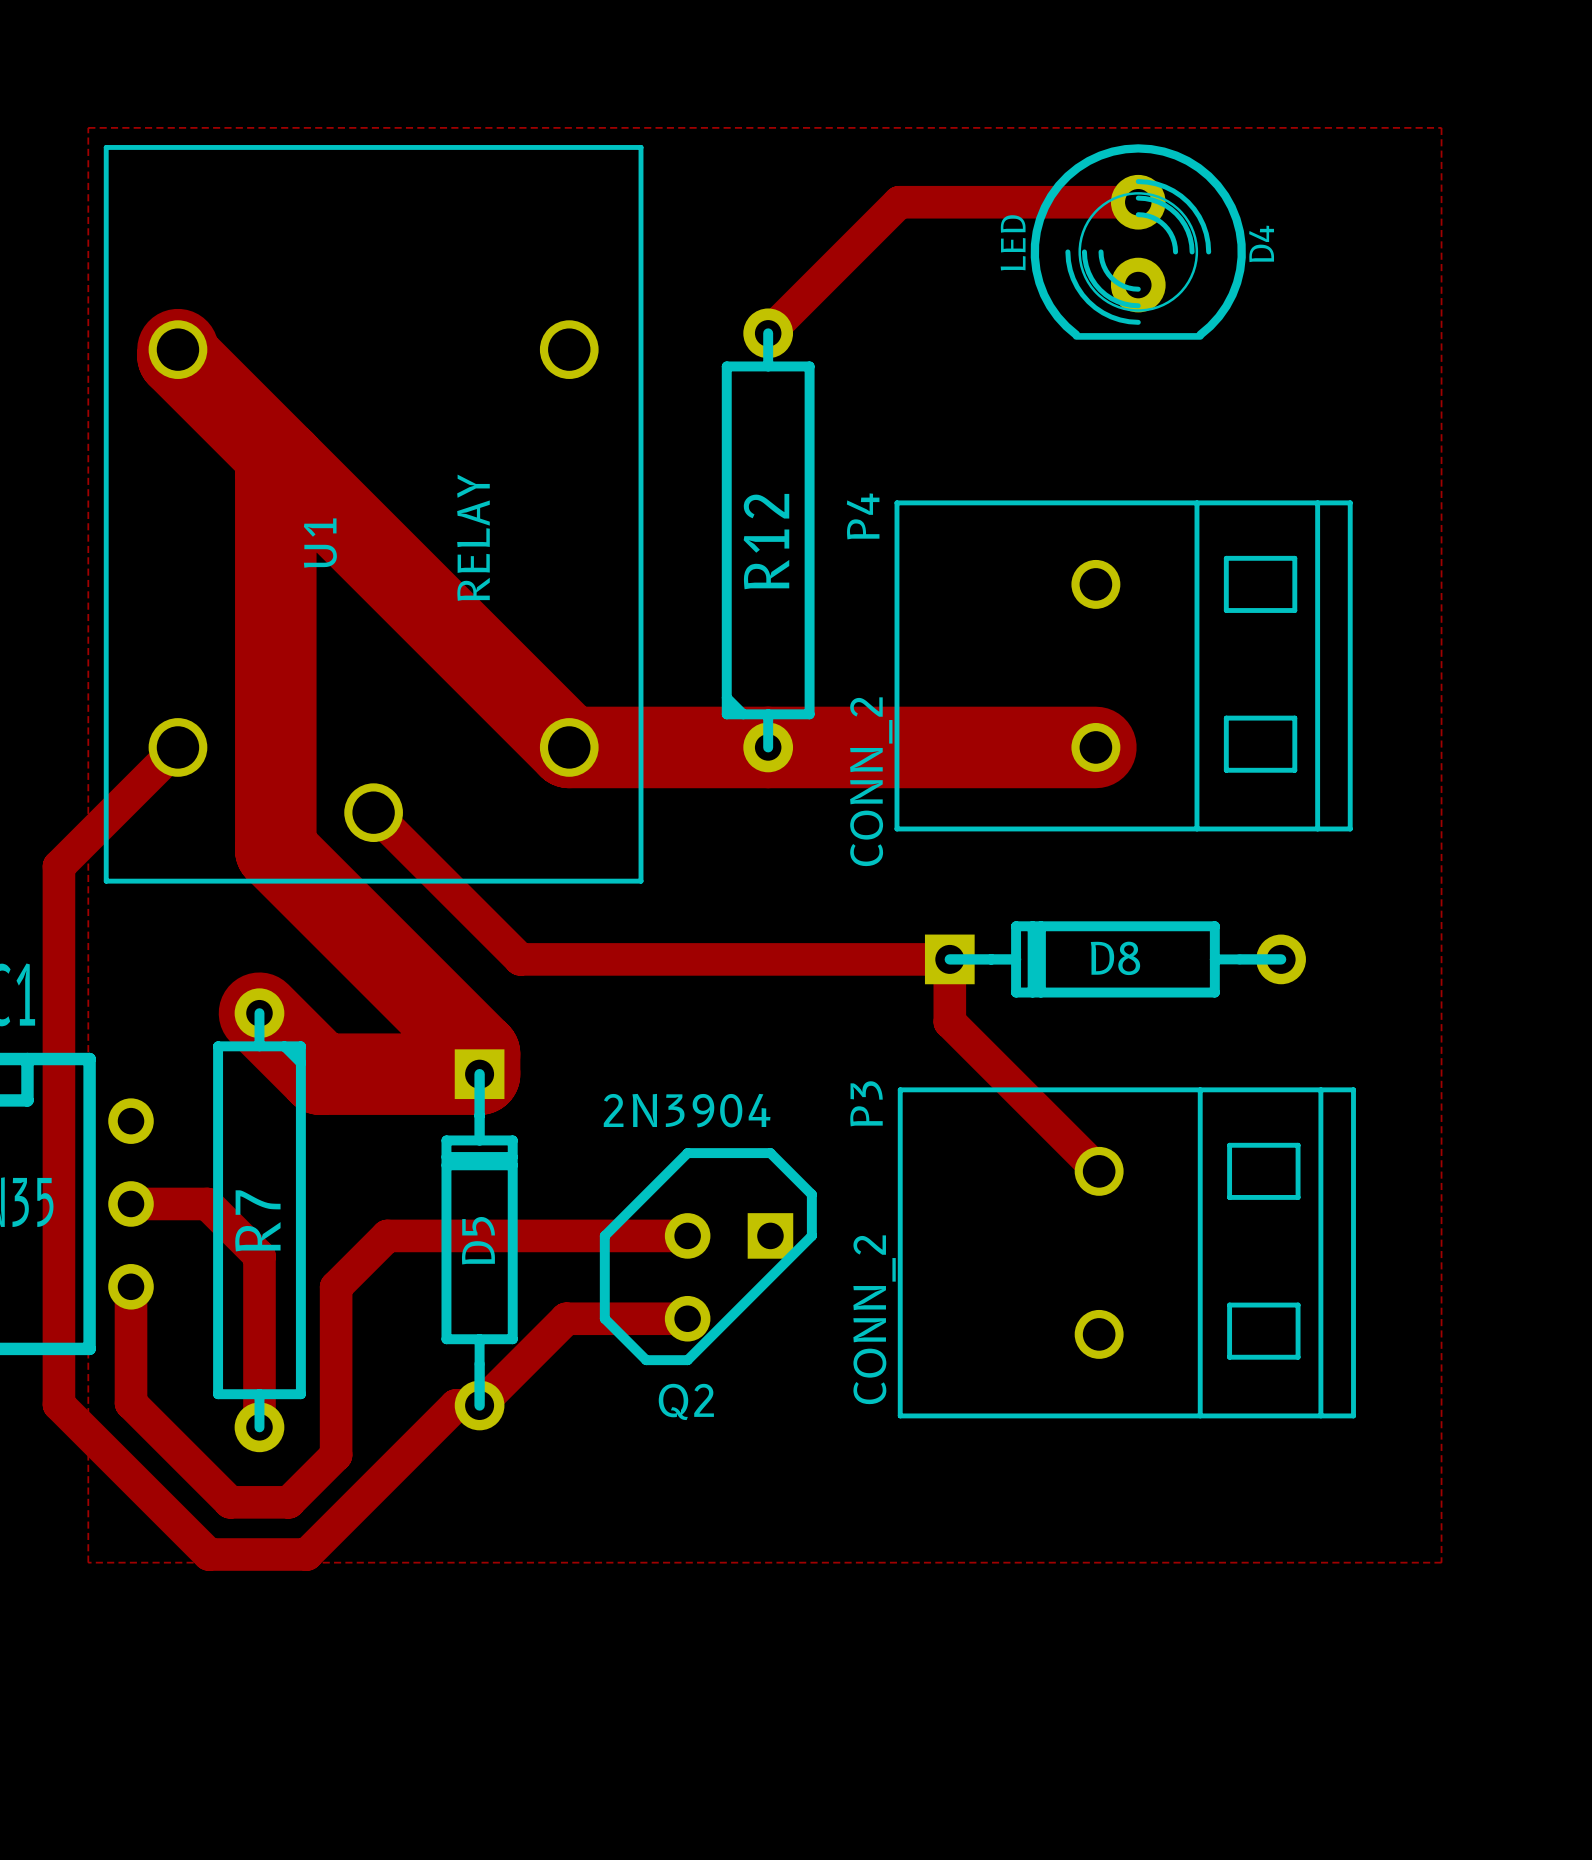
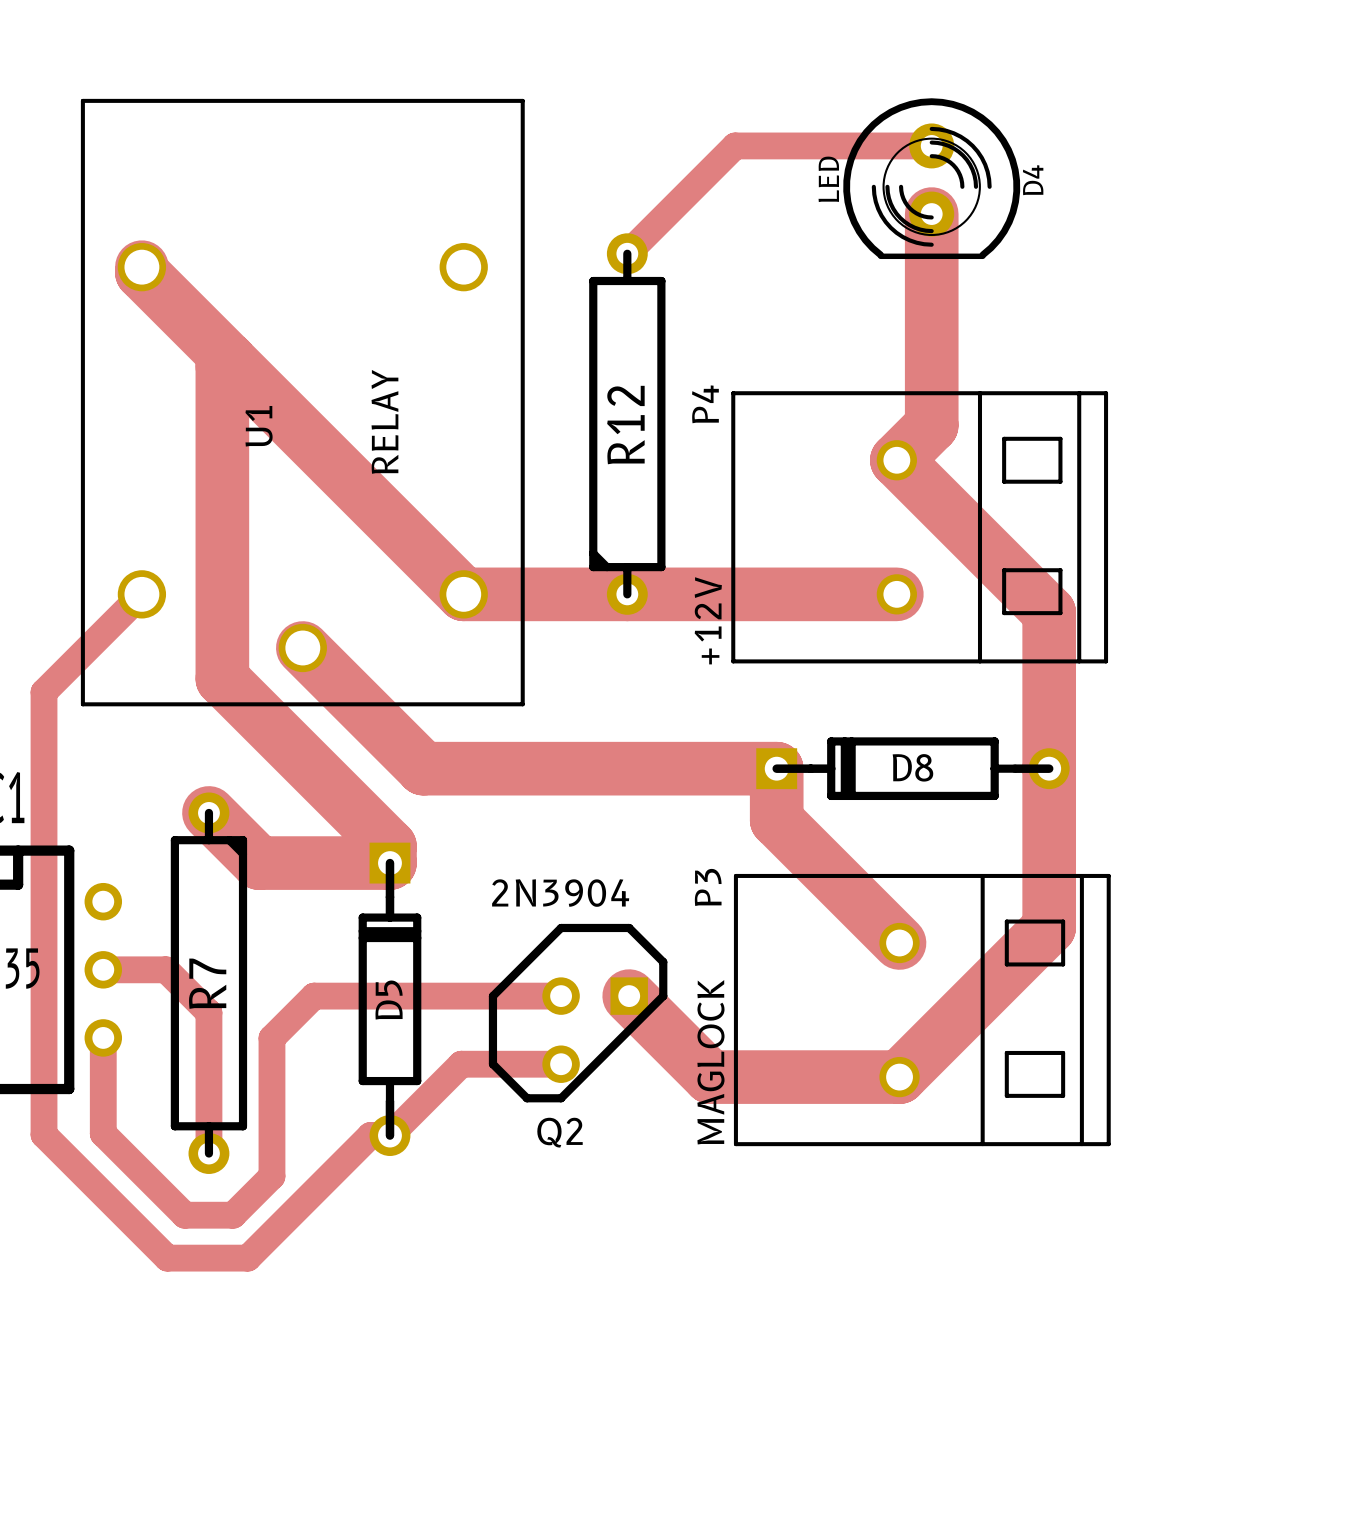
top zone outline: (88, 127) (1441, 127) (1441, 1562) (88, 1562) (88, 127) -> none
top track: none -> (931, 214) (931, 425) (896, 460) (1049, 612) (1049, 927) (899, 1077) (710, 1077) (629, 996)
top track width: thick (177, 349) (177, 356) (569, 747) (1095, 747) -> thin (141, 267) (141, 272) (463, 594) (896, 594)
top track width: thick (283, 462) (275, 470) (275, 850) (479, 1053) (479, 1074) (320, 1074) (259, 1013) -> thin (229, 359) (222, 366) (222, 678) (389, 846) (389, 863) (259, 863) (208, 812)
P4 value: CONN_2 (871, 781) -> +12V (708, 620)
top track width: thin (373, 812) (520, 959) (949, 959) (949, 1022) (1099, 1171) -> thick (302, 647) (423, 768) (776, 768) (776, 820) (899, 943)
P3 value: CONN_2 (874, 1319) -> MAGLOCK (710, 1062)

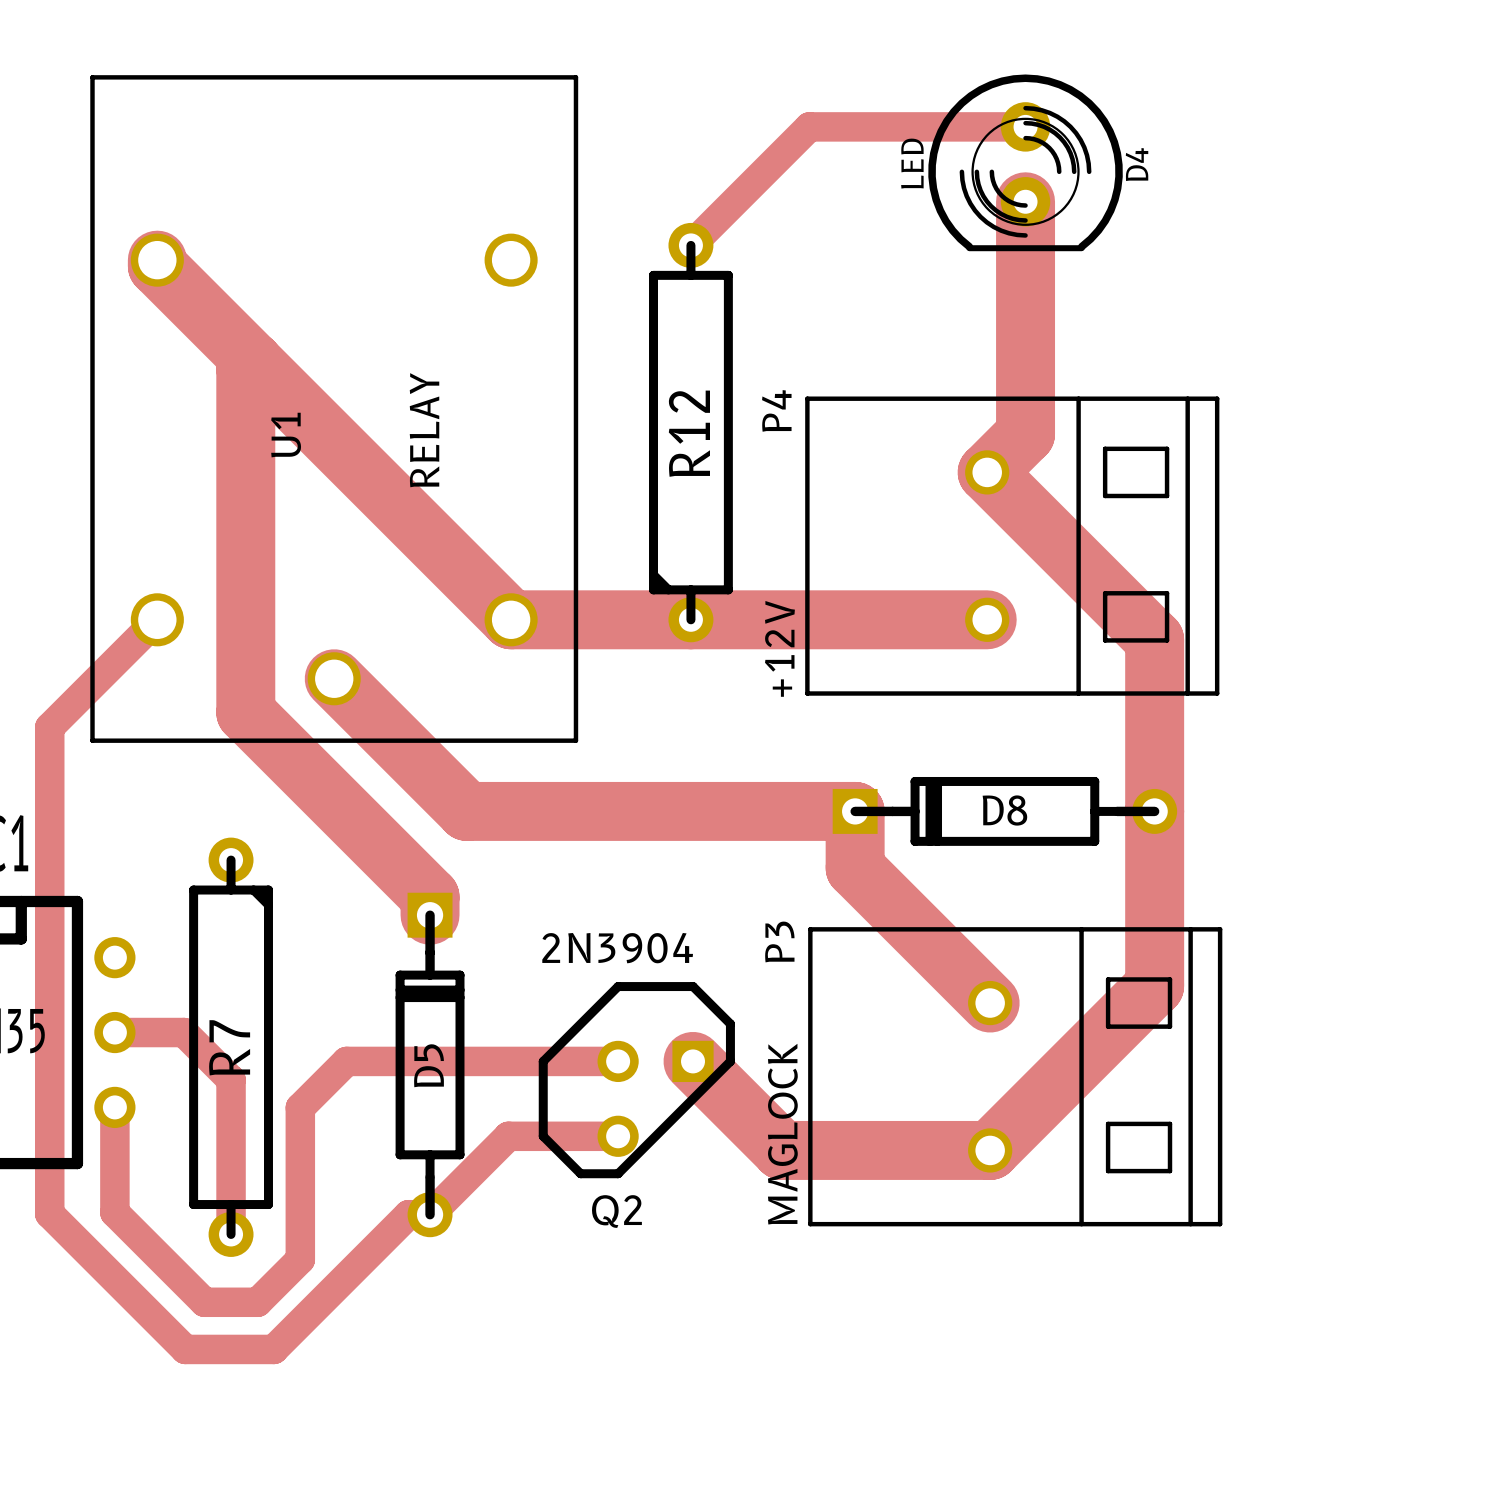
top track: (208, 812) (259, 863) (389, 863) -> none

